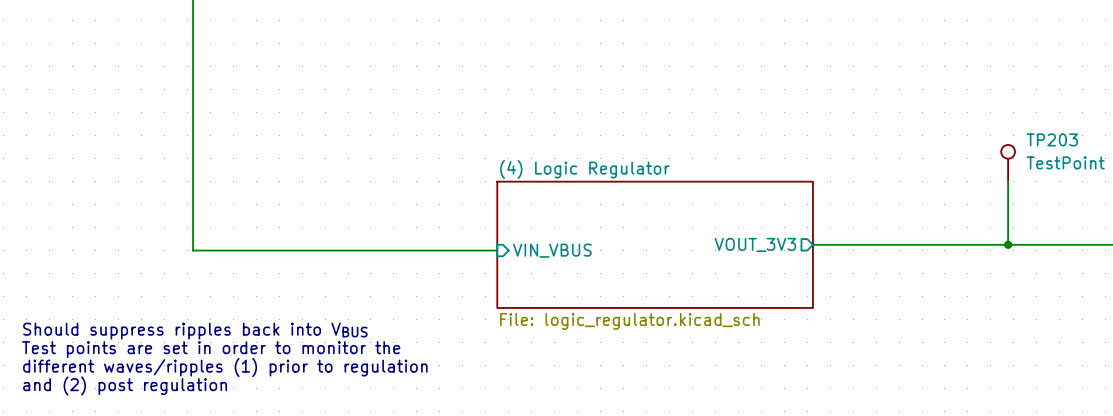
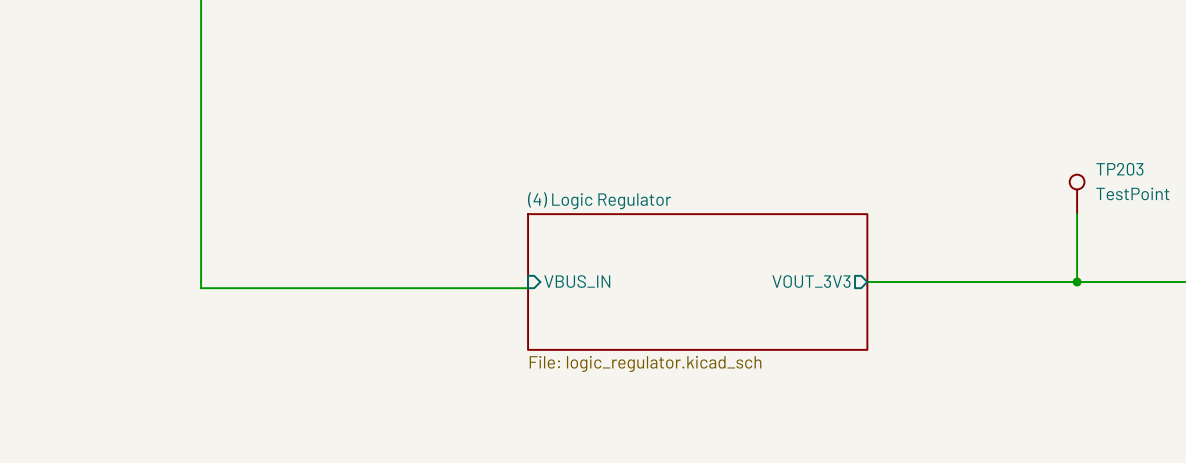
sheet pin: VIN_VBUS (552, 250) -> VBUS_IN (577, 281)
text: Should suppress ripples back into VBUS (195, 331) -> none
text: Test points are set in order to monitor the (211, 349) -> none
text: different waves/ripples (1) prior to regulation (225, 367) -> none
text: and (2) post regulation (125, 386) -> none

